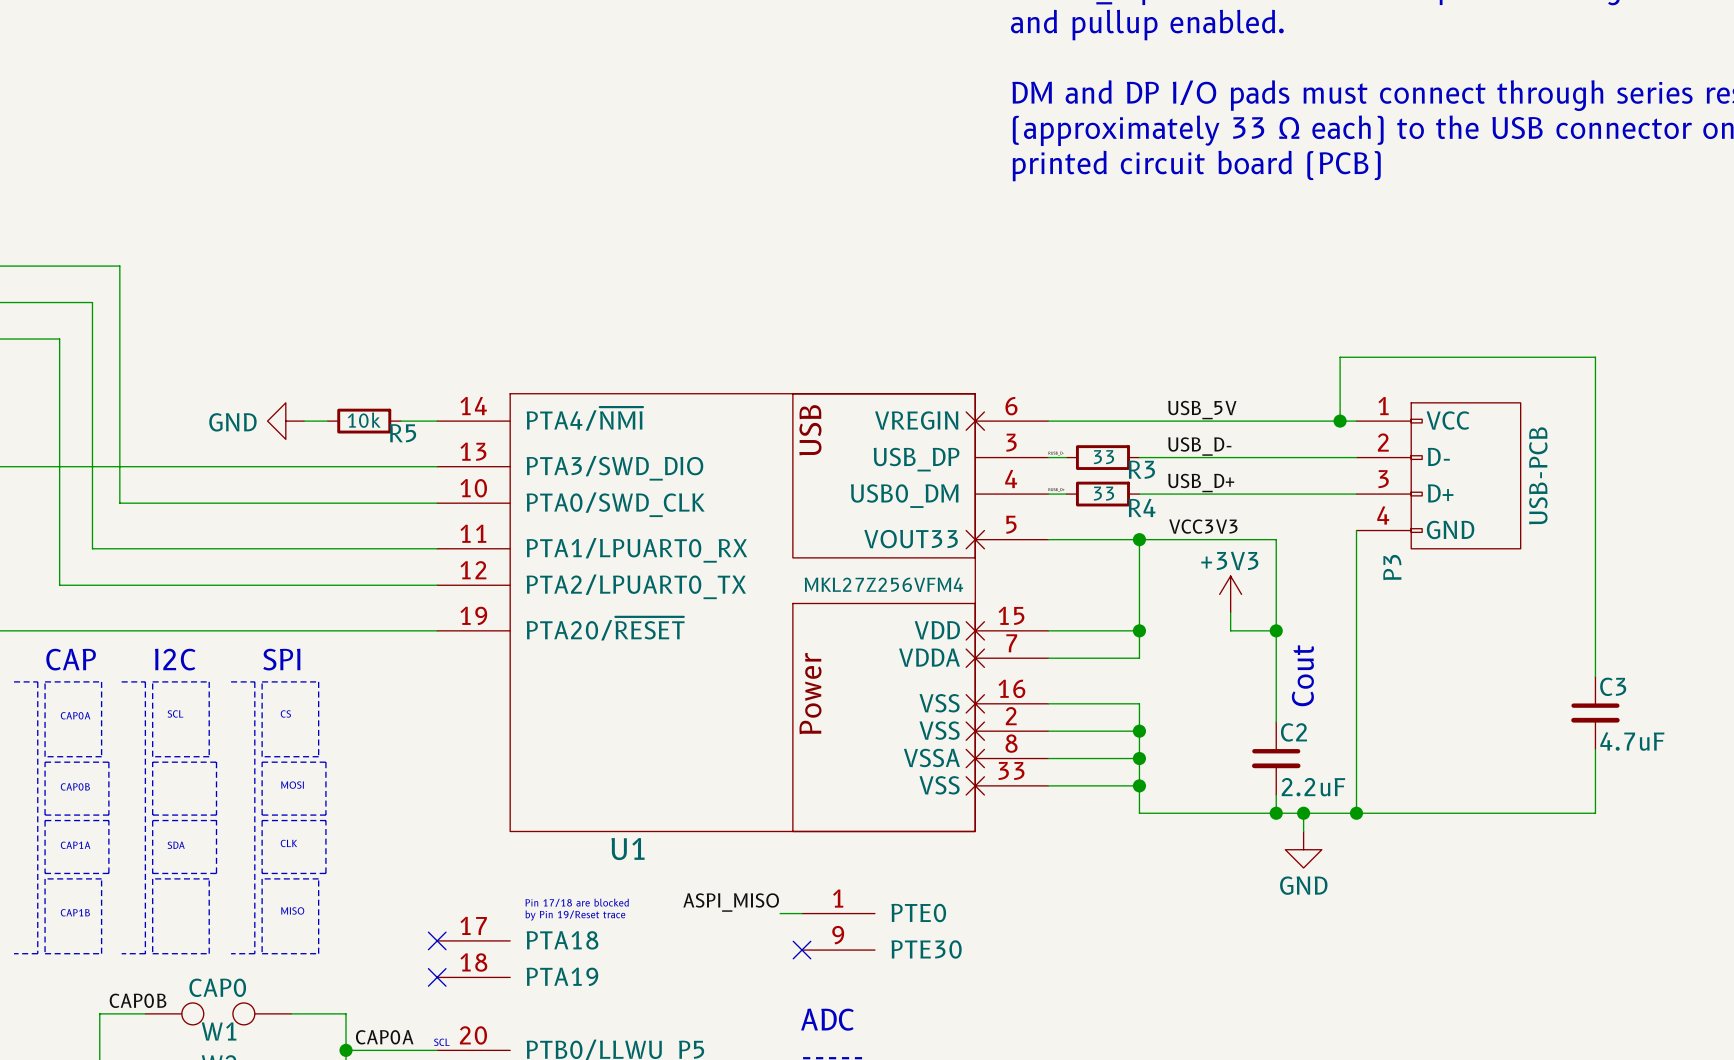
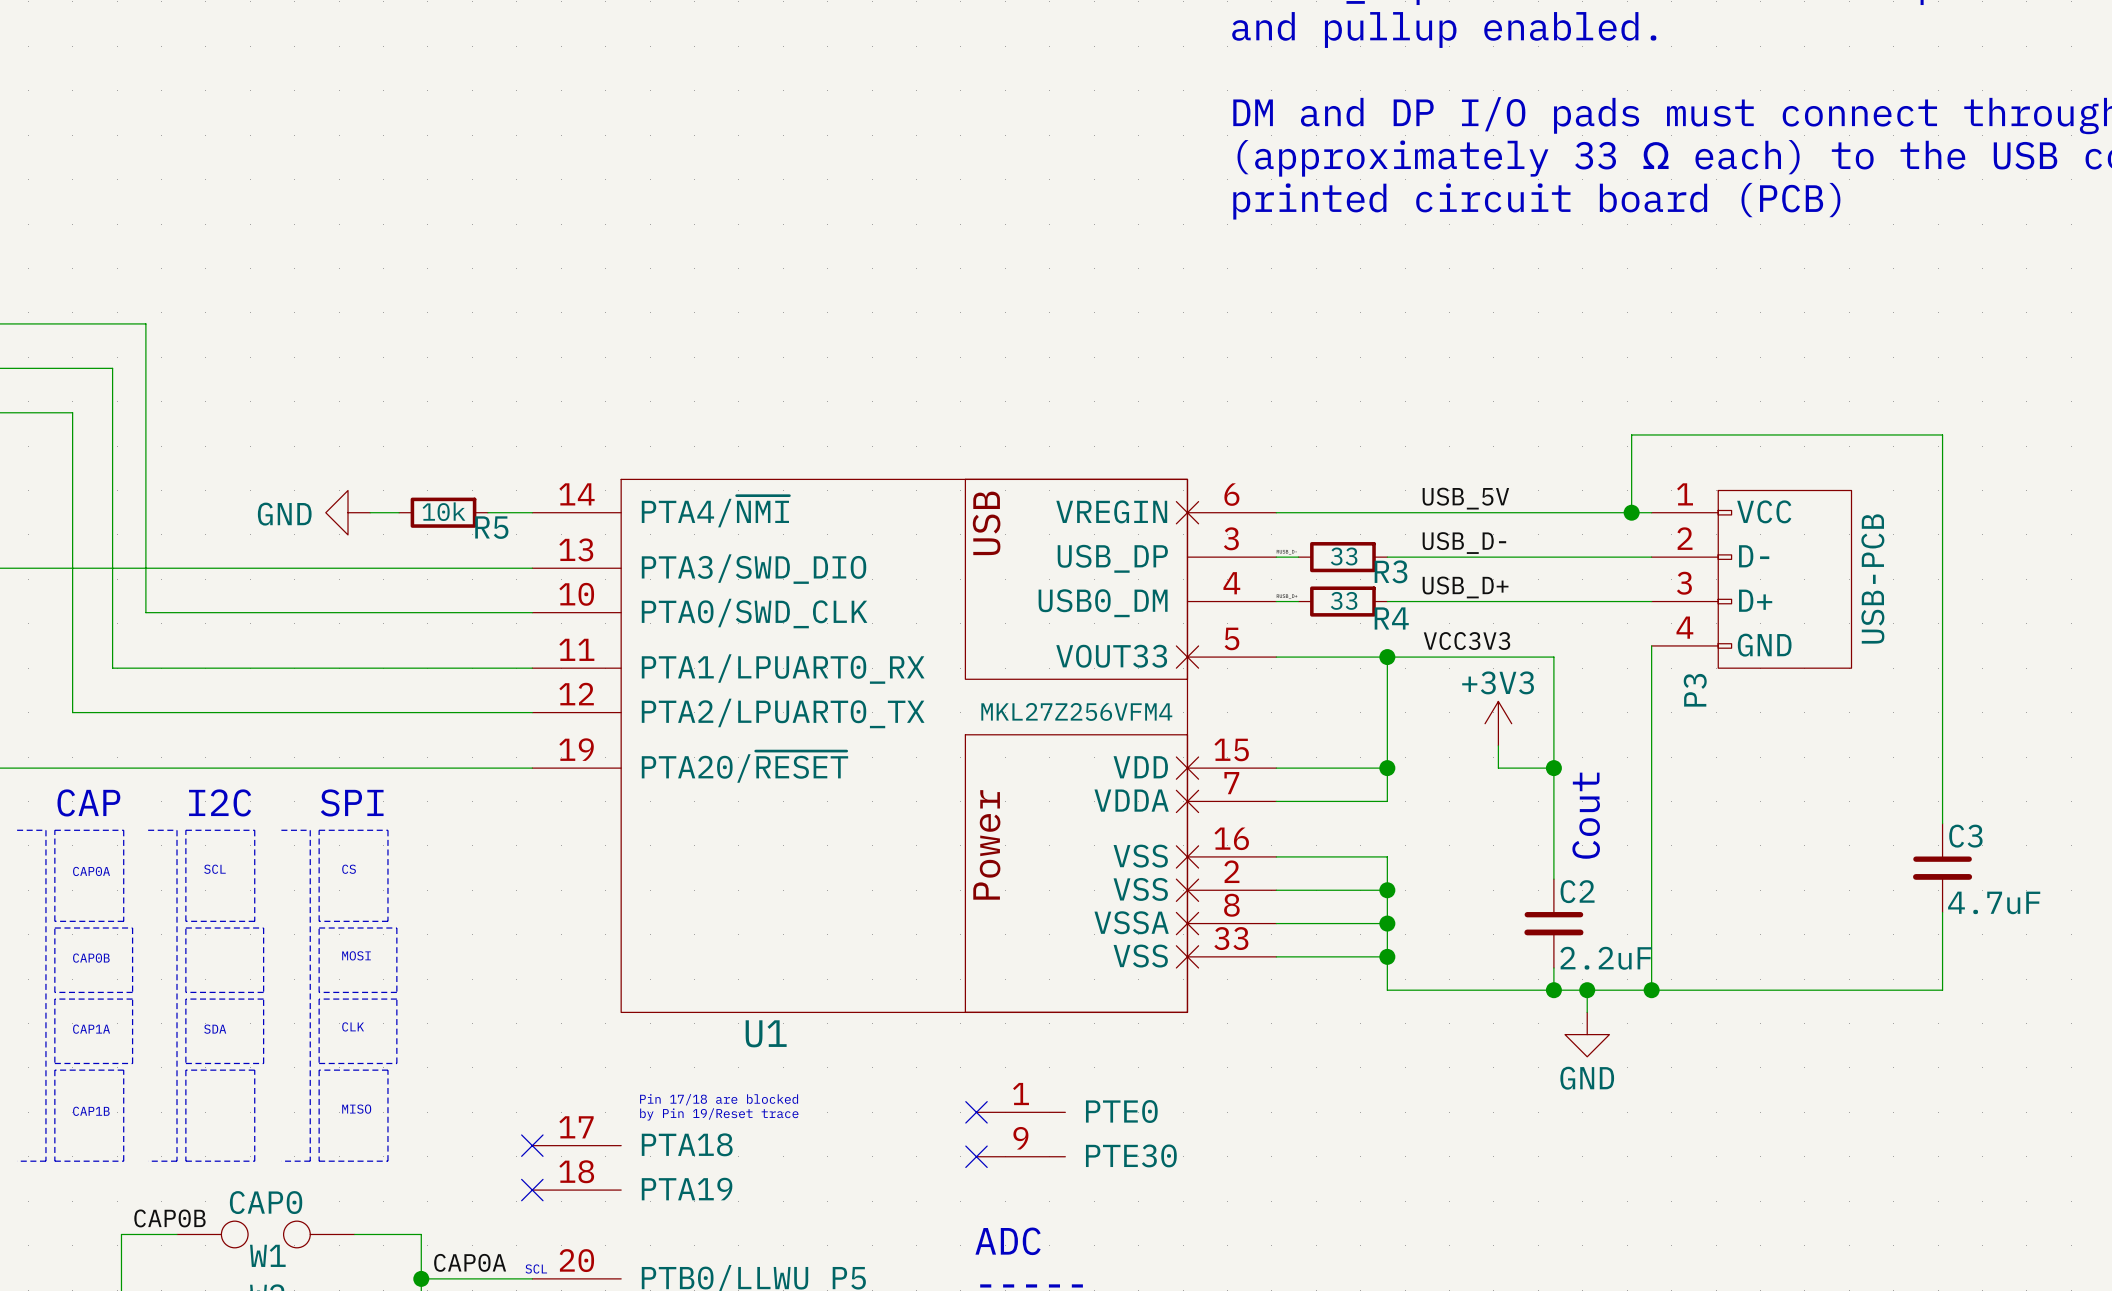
label: ASPI_MISO (731, 902) -> none
wire: (780, 913) (802, 913) -> none
no-connect mark: none -> (976, 1112)

